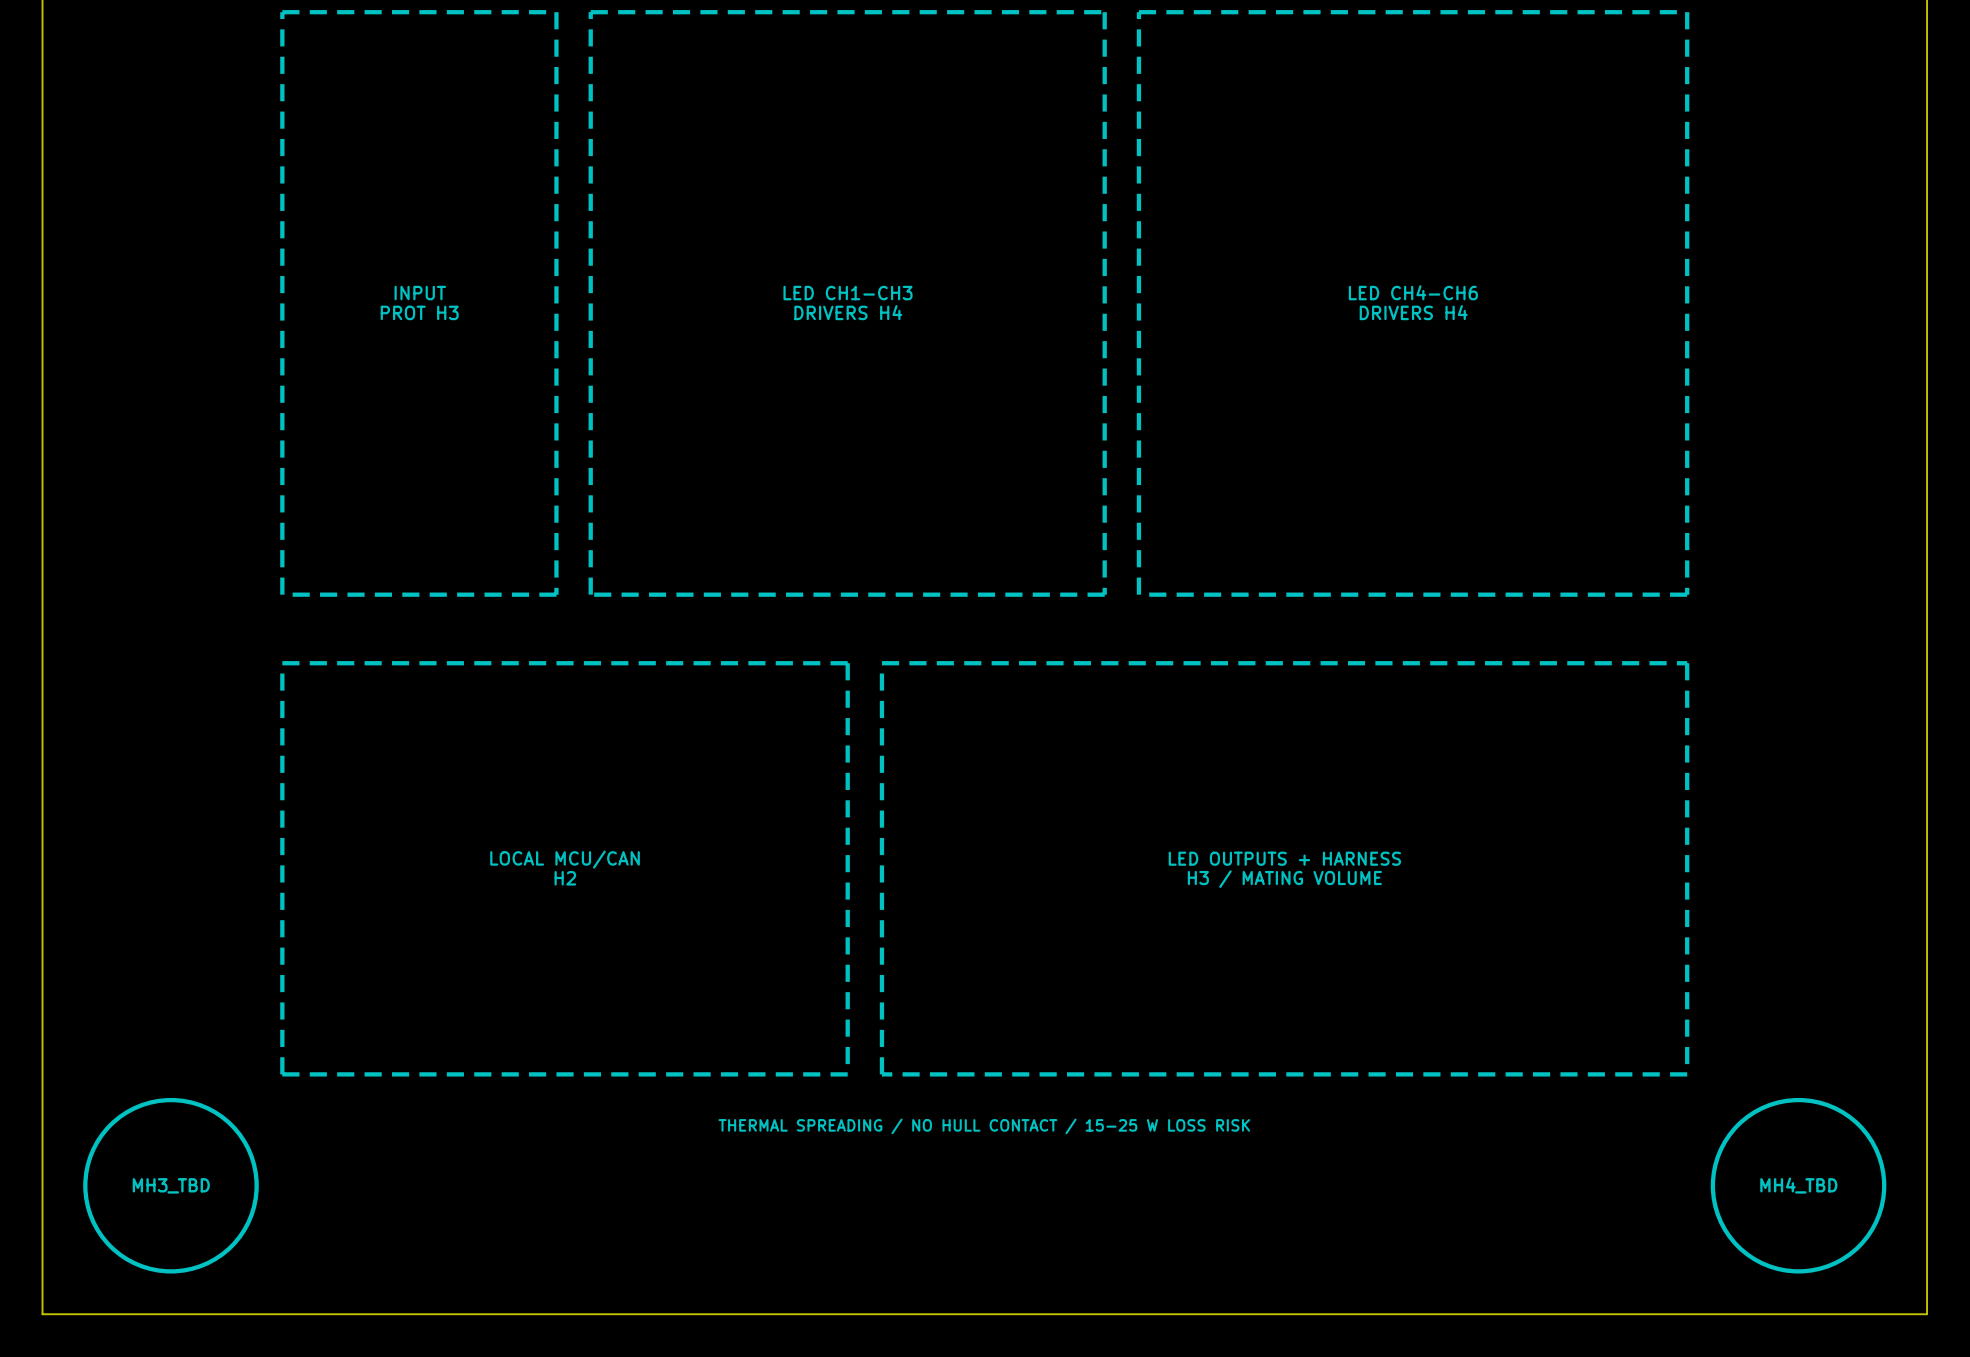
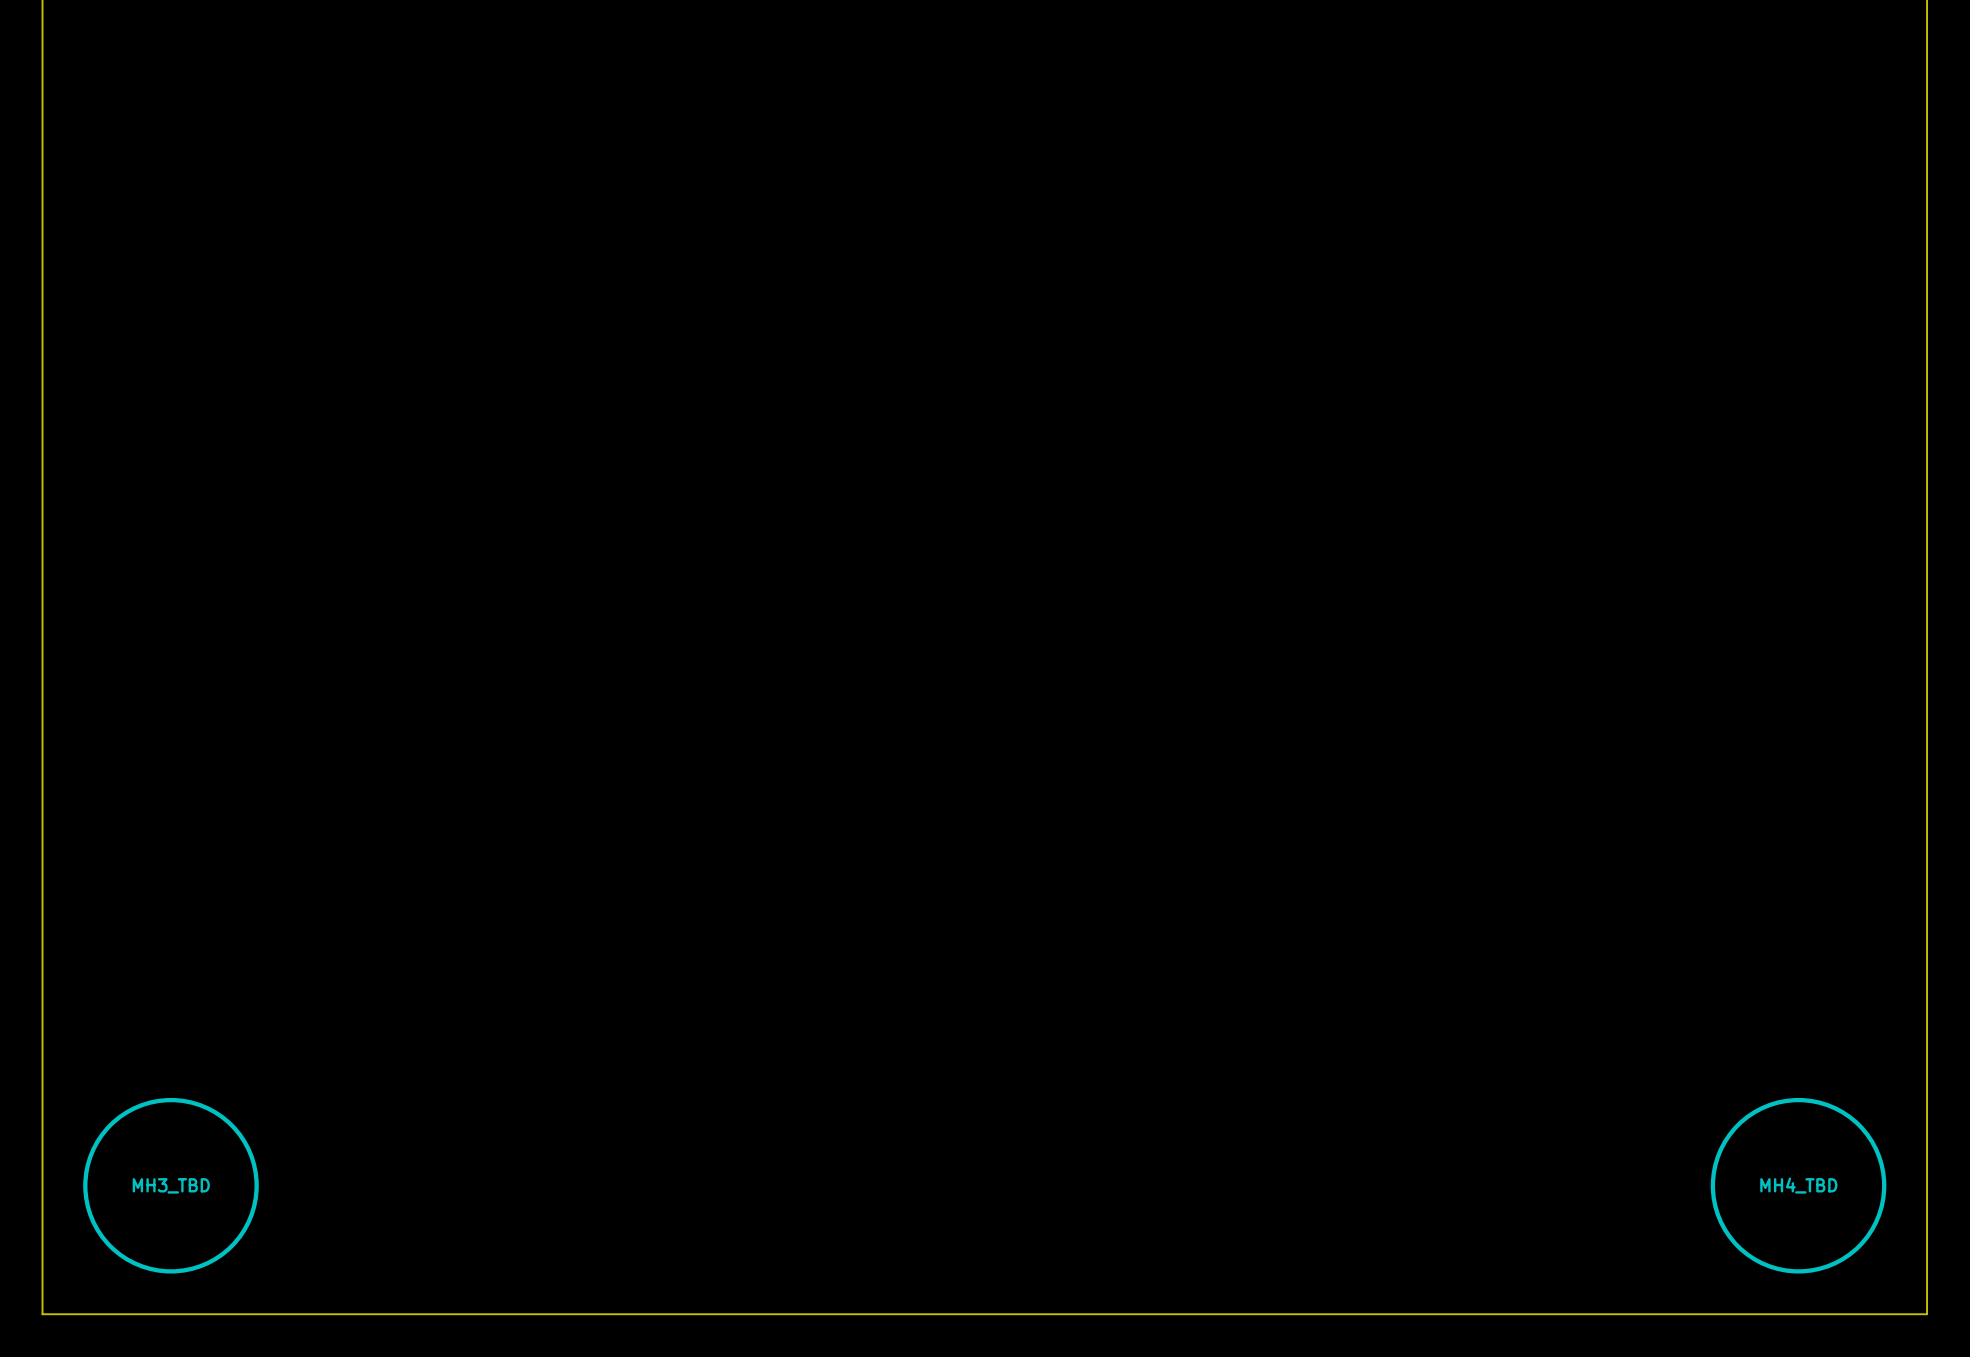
line: (282, 12) (556, 12) (556, 594) (282, 594) (282, 12) -> none
line: (590, 12) (1104, 12) (1104, 594) (590, 594) (590, 12) -> none
line: (1138, 12) (1687, 12) (1687, 594) (1138, 594) (1138, 12) -> none
text: LED CH4-CH6 (1413, 292) -> none
text: INPUT (420, 293) -> none
text: LED CH1-CH3 (848, 293) -> none
text: PROT H3 (419, 312) -> none
text: DRIVERS H4 (848, 312) -> none
text: DRIVERS H4 (1413, 312) -> none
line: (282, 663) (282, 1074) (847, 1074) (847, 663) (282, 663) -> none
line: (881, 663) (1687, 663) (1687, 1074) (881, 1074) (881, 663) -> none
text: LED OUTPUTS + HARNESS (1284, 858) -> none
text: LOCAL MCU/CAN (565, 859) -> none
text: H2 (565, 878) -> none
text: H3 / MATING VOLUME (1284, 879) -> none
text: THERMAL SPREADING / NO HULL CONTACT / 15-25 W LOSS RISK (984, 1126) -> none

